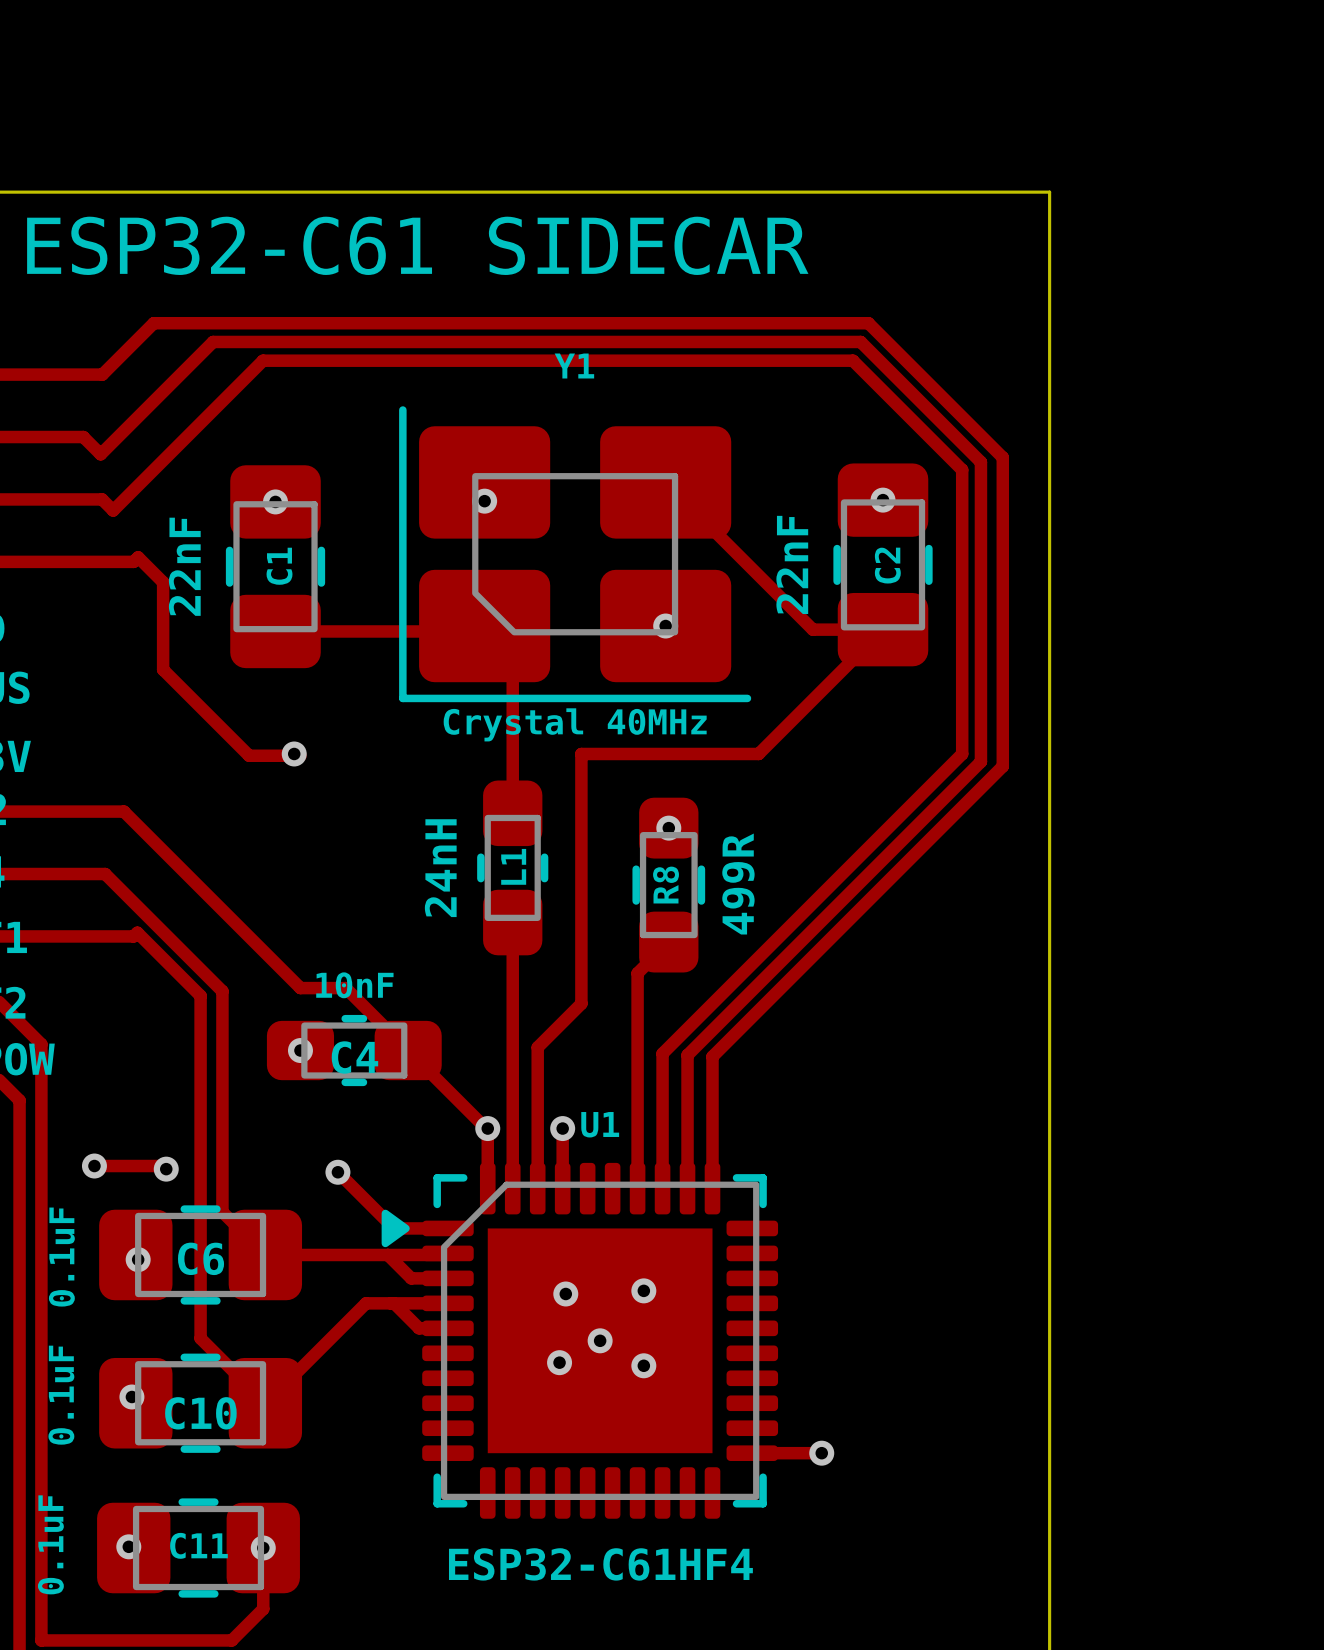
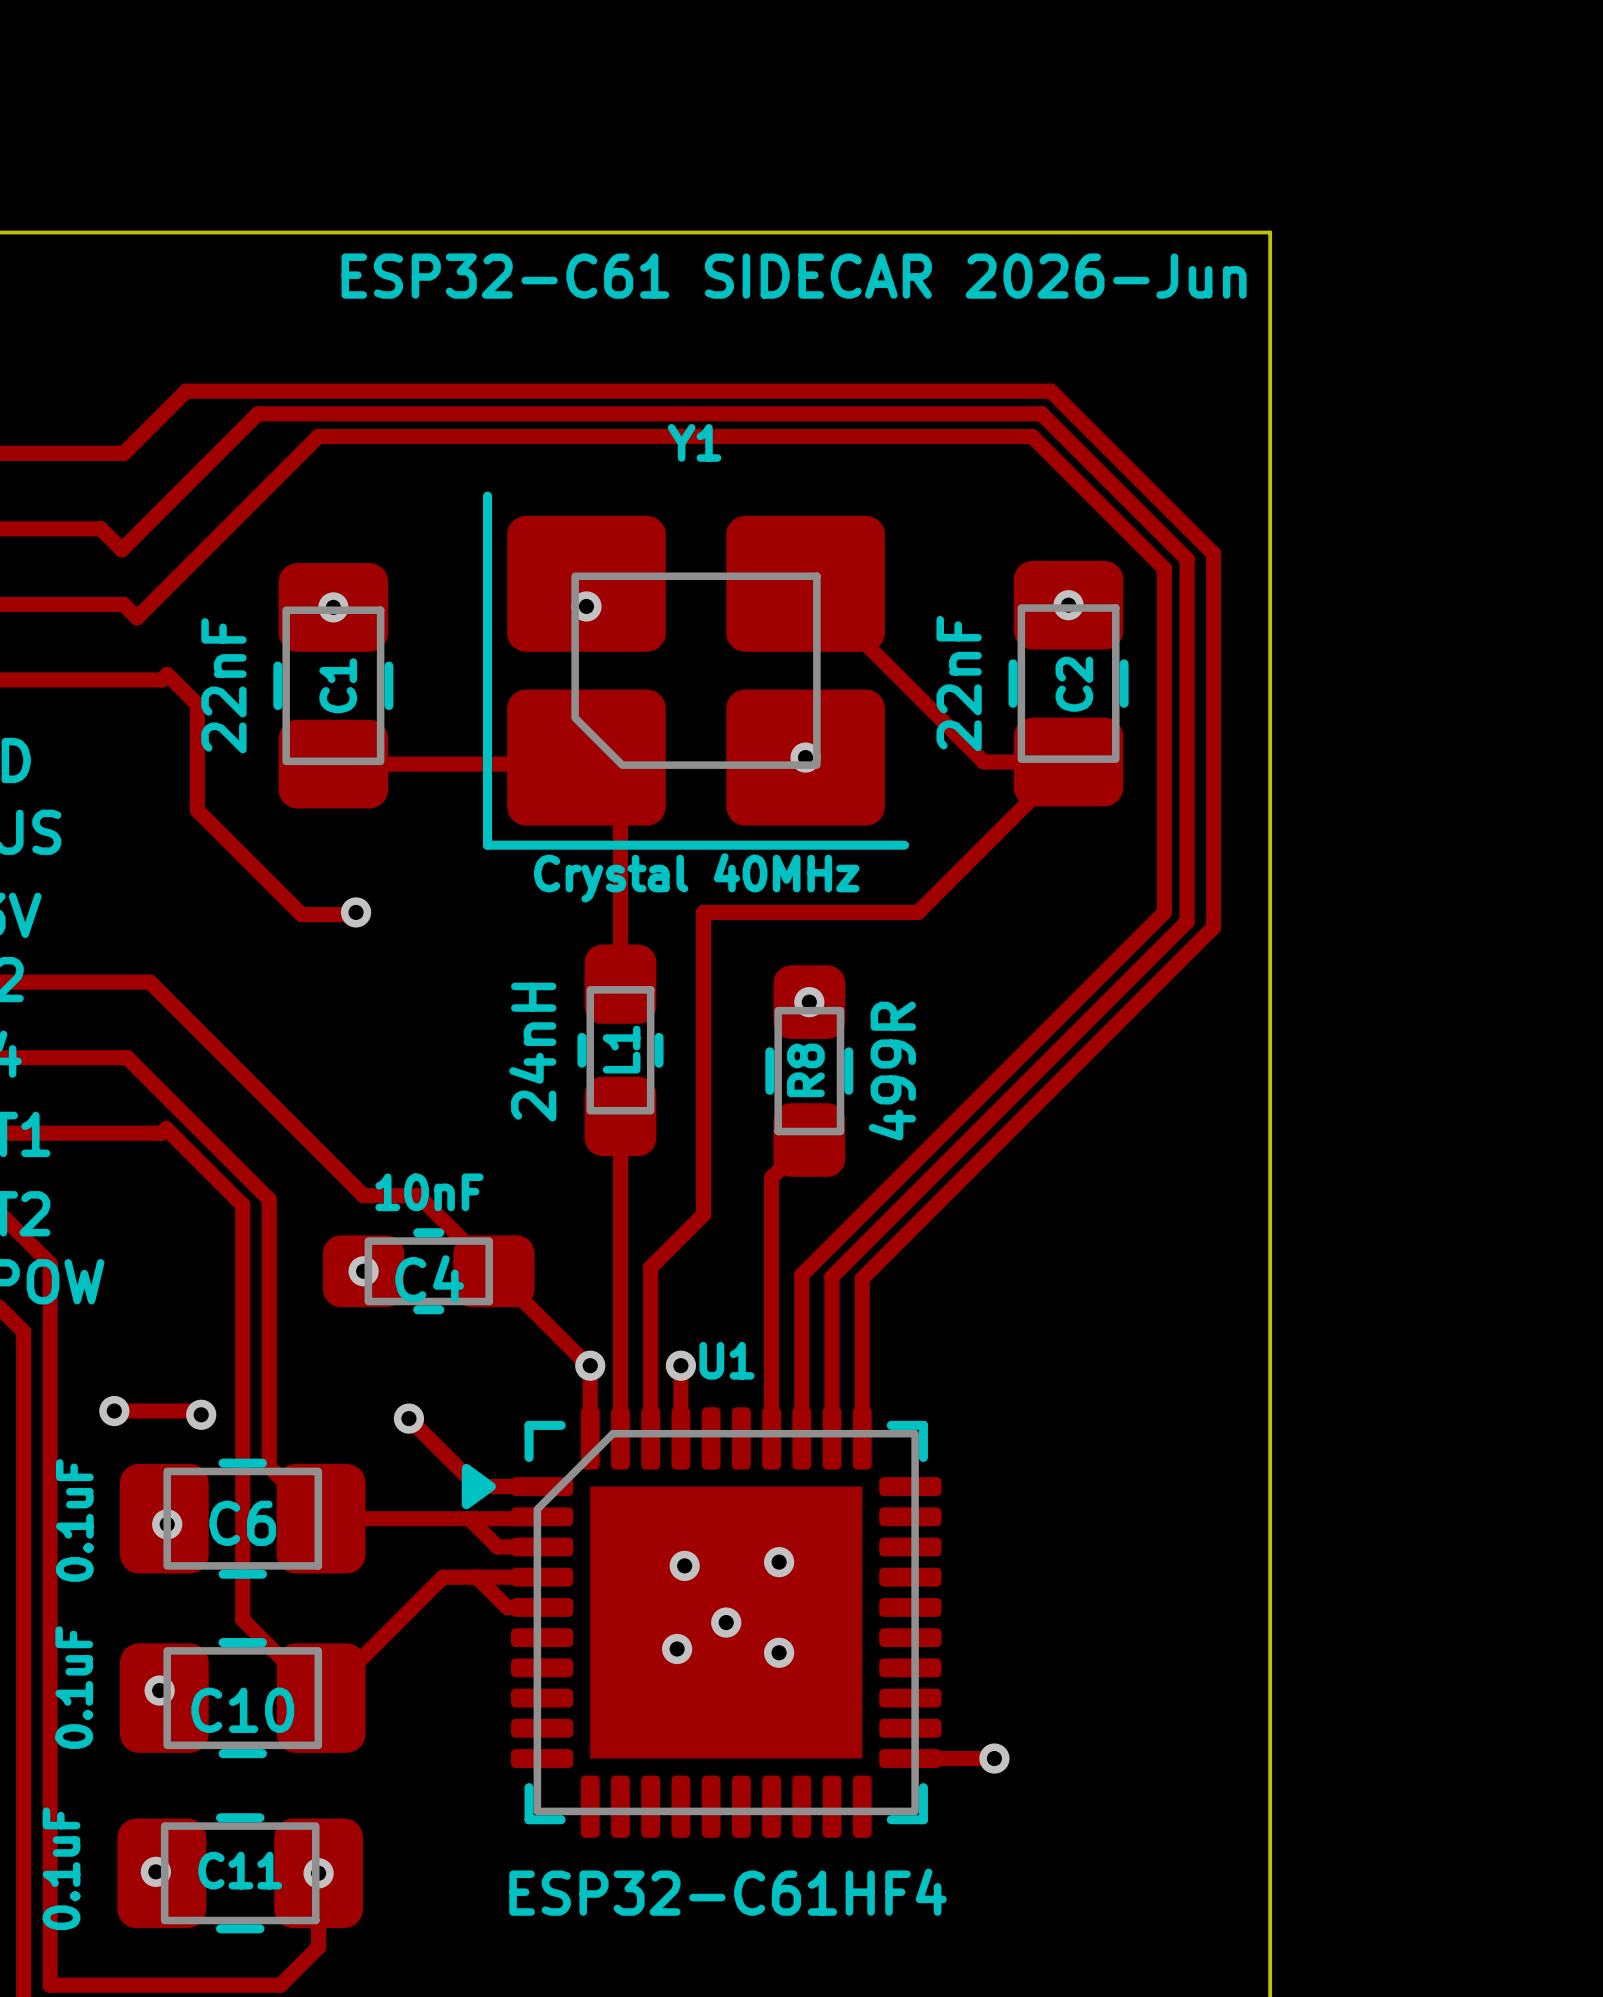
text: ESP32-C61 SIDECAR (417, 245) -> ESP32-C61 SIDECAR 2026-Jun (794, 276)

